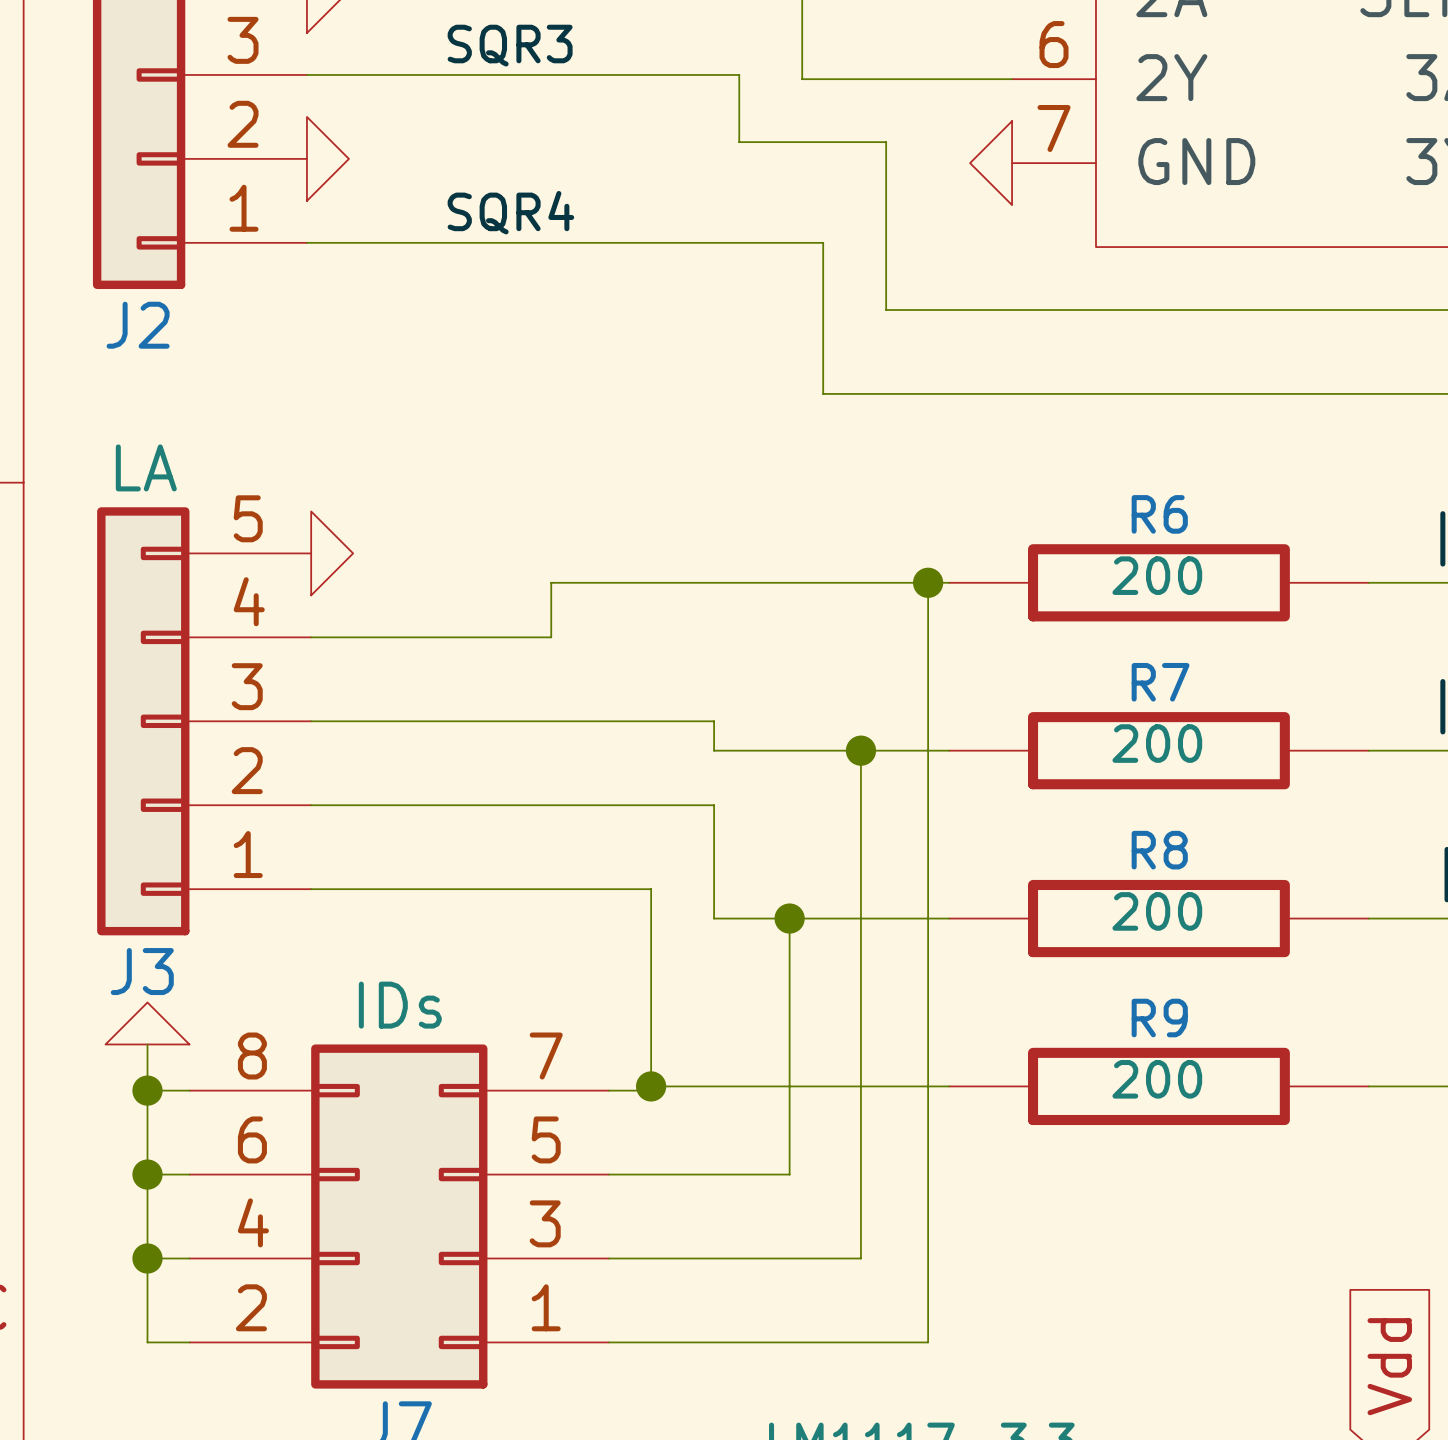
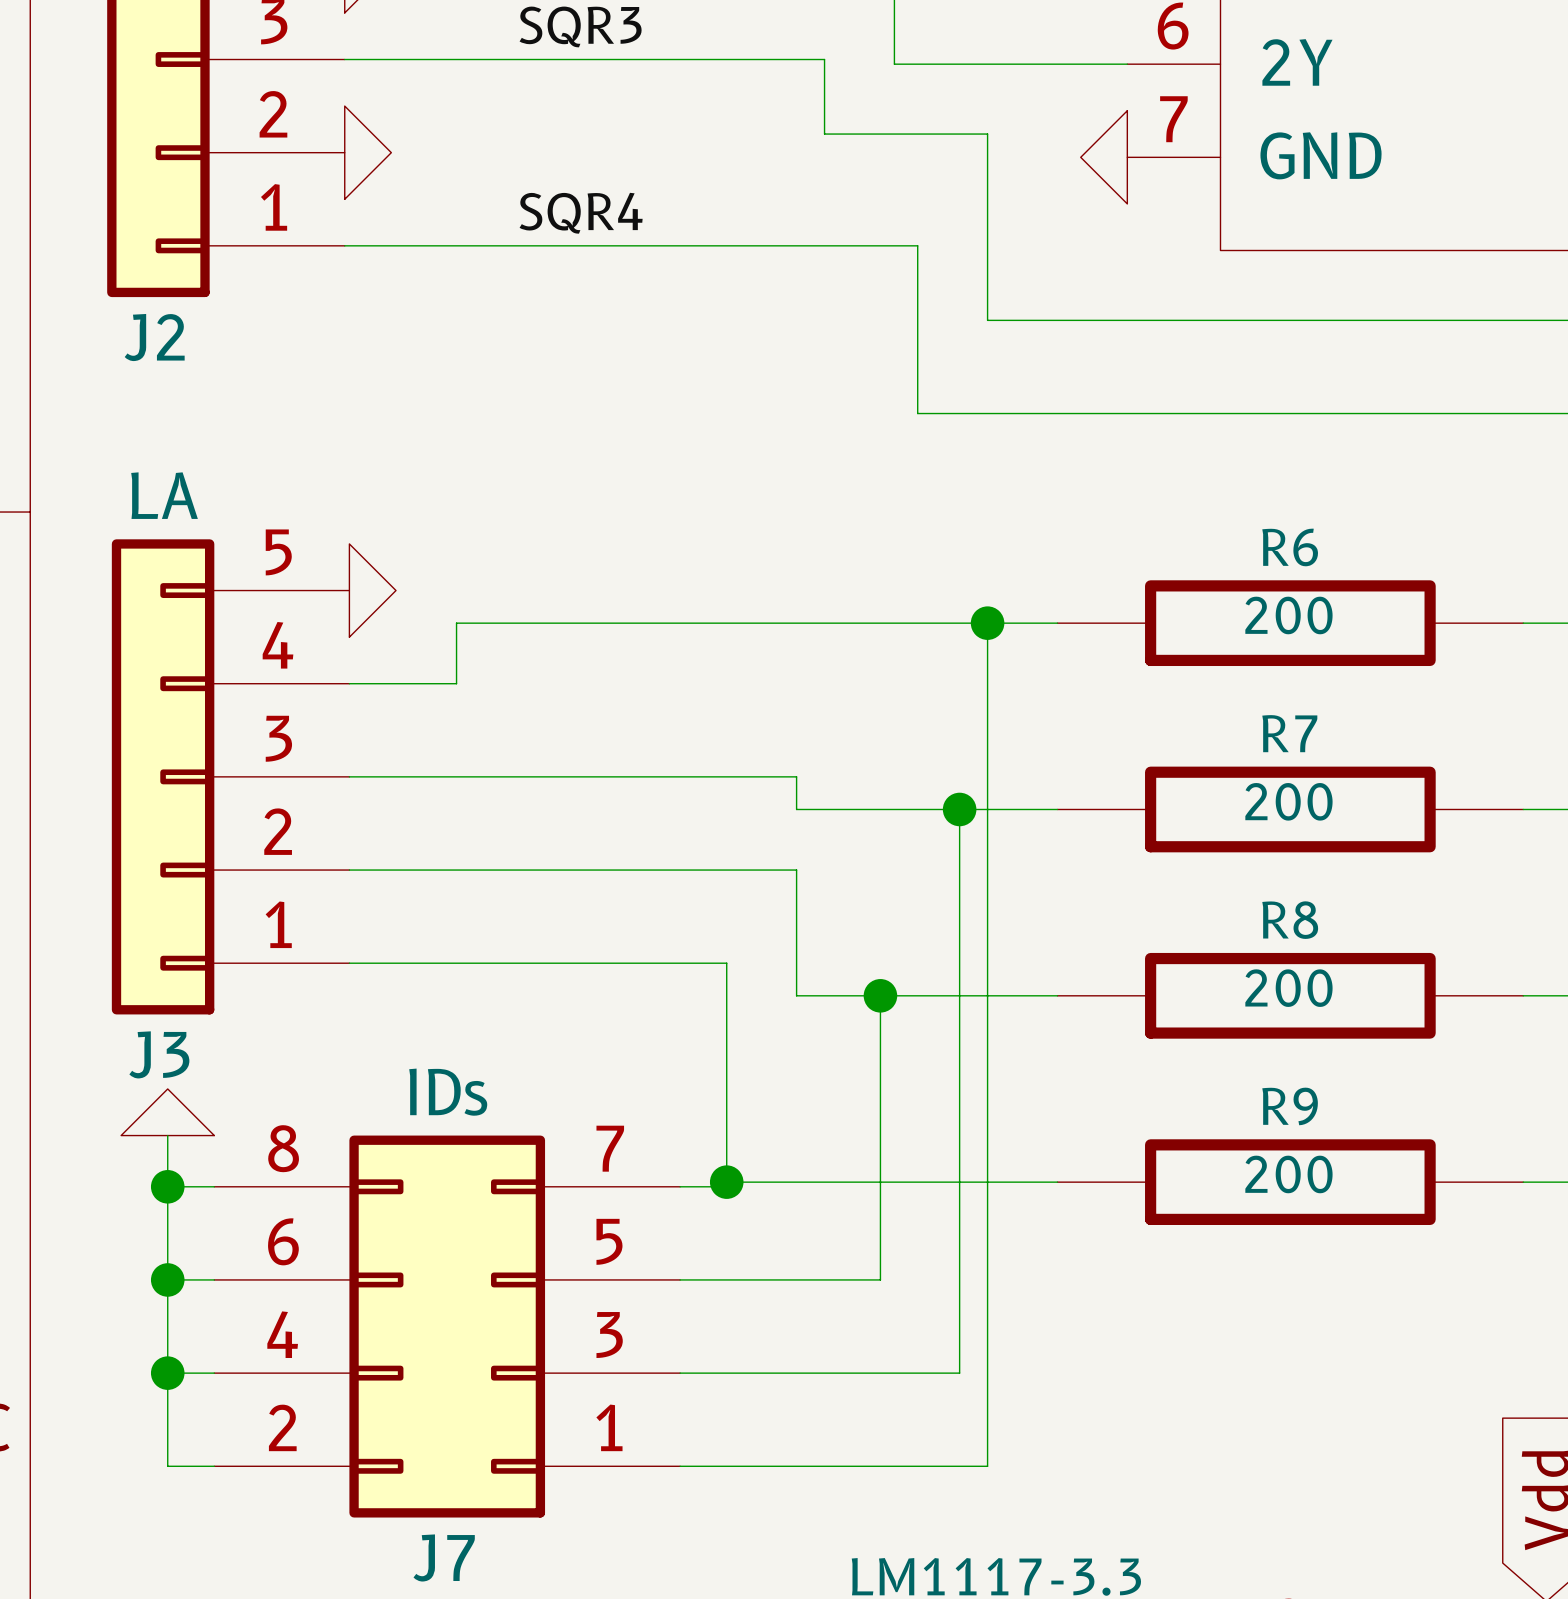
wire: (551, 582) (551, 637) (407, 637) -> (615, 623) (456, 623) (456, 683)
wire: (928, 582) (928, 1342) (886, 1342) -> (987, 623) (987, 1466)
junction position: (928, 582) -> (987, 623)

